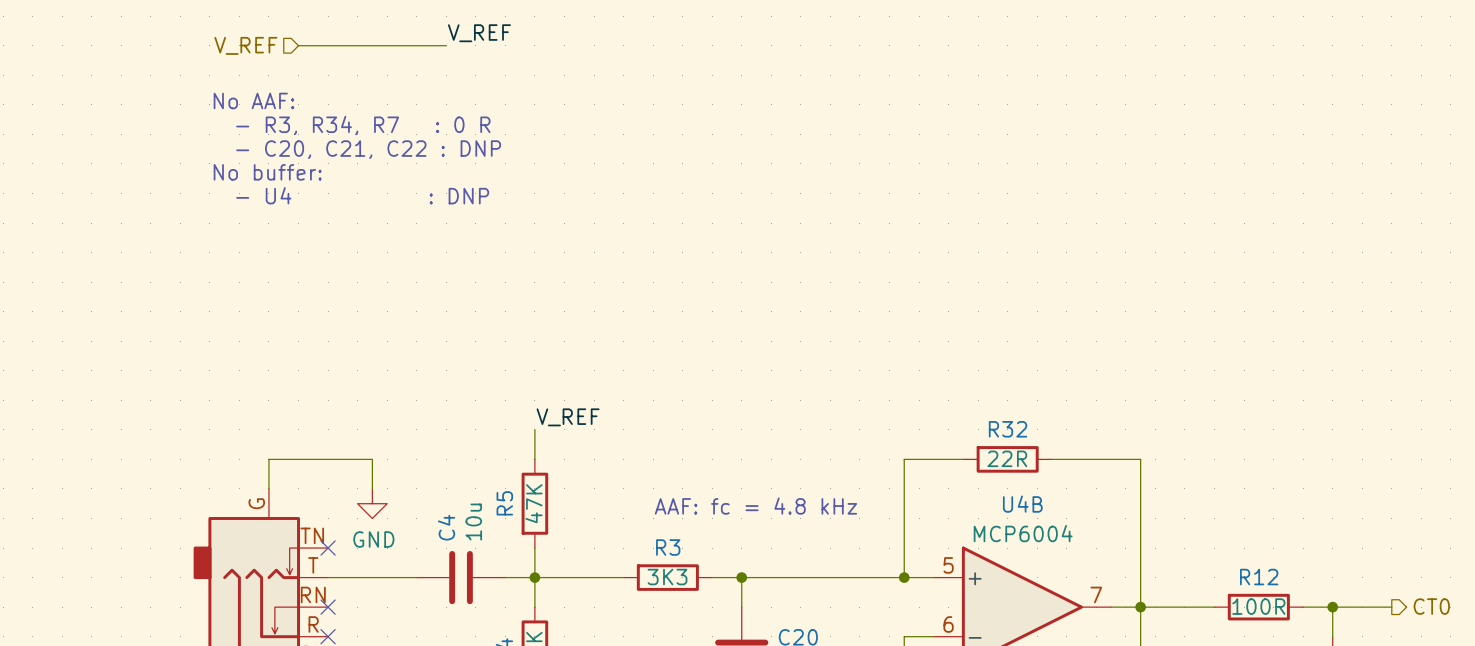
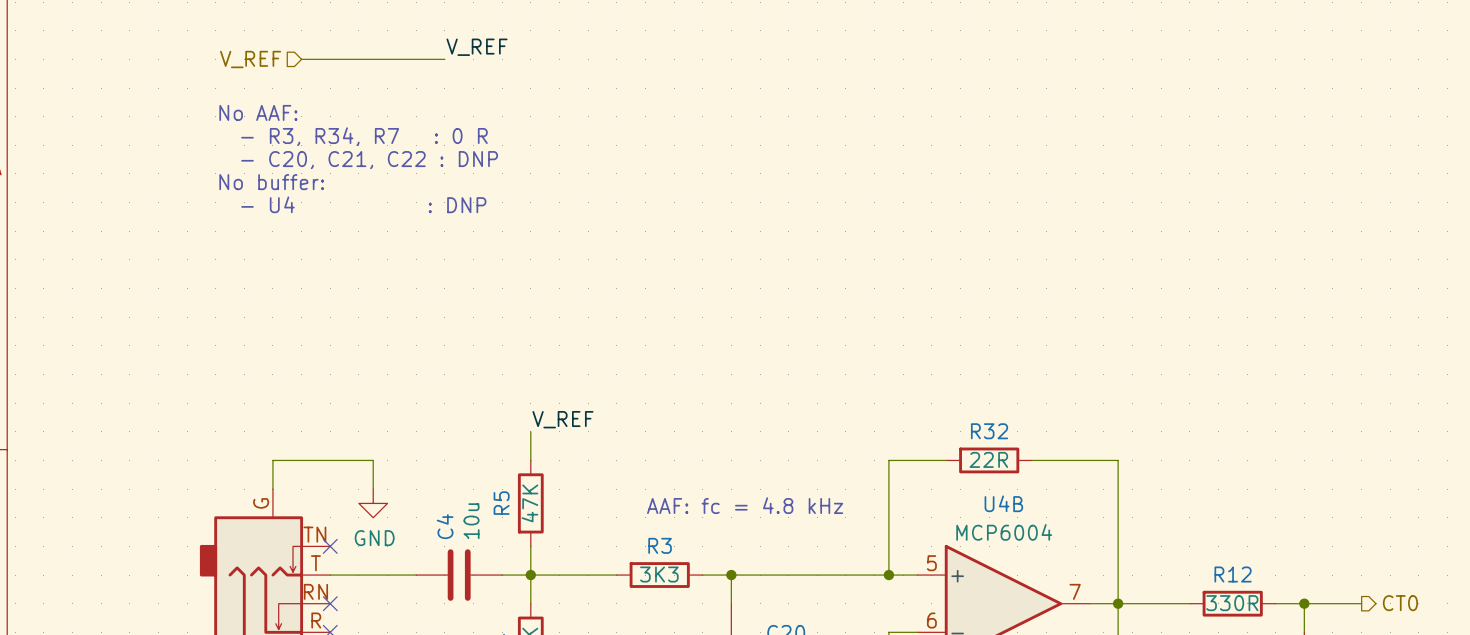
R12 value: 100R (1258, 606) -> 330R (1232, 603)

